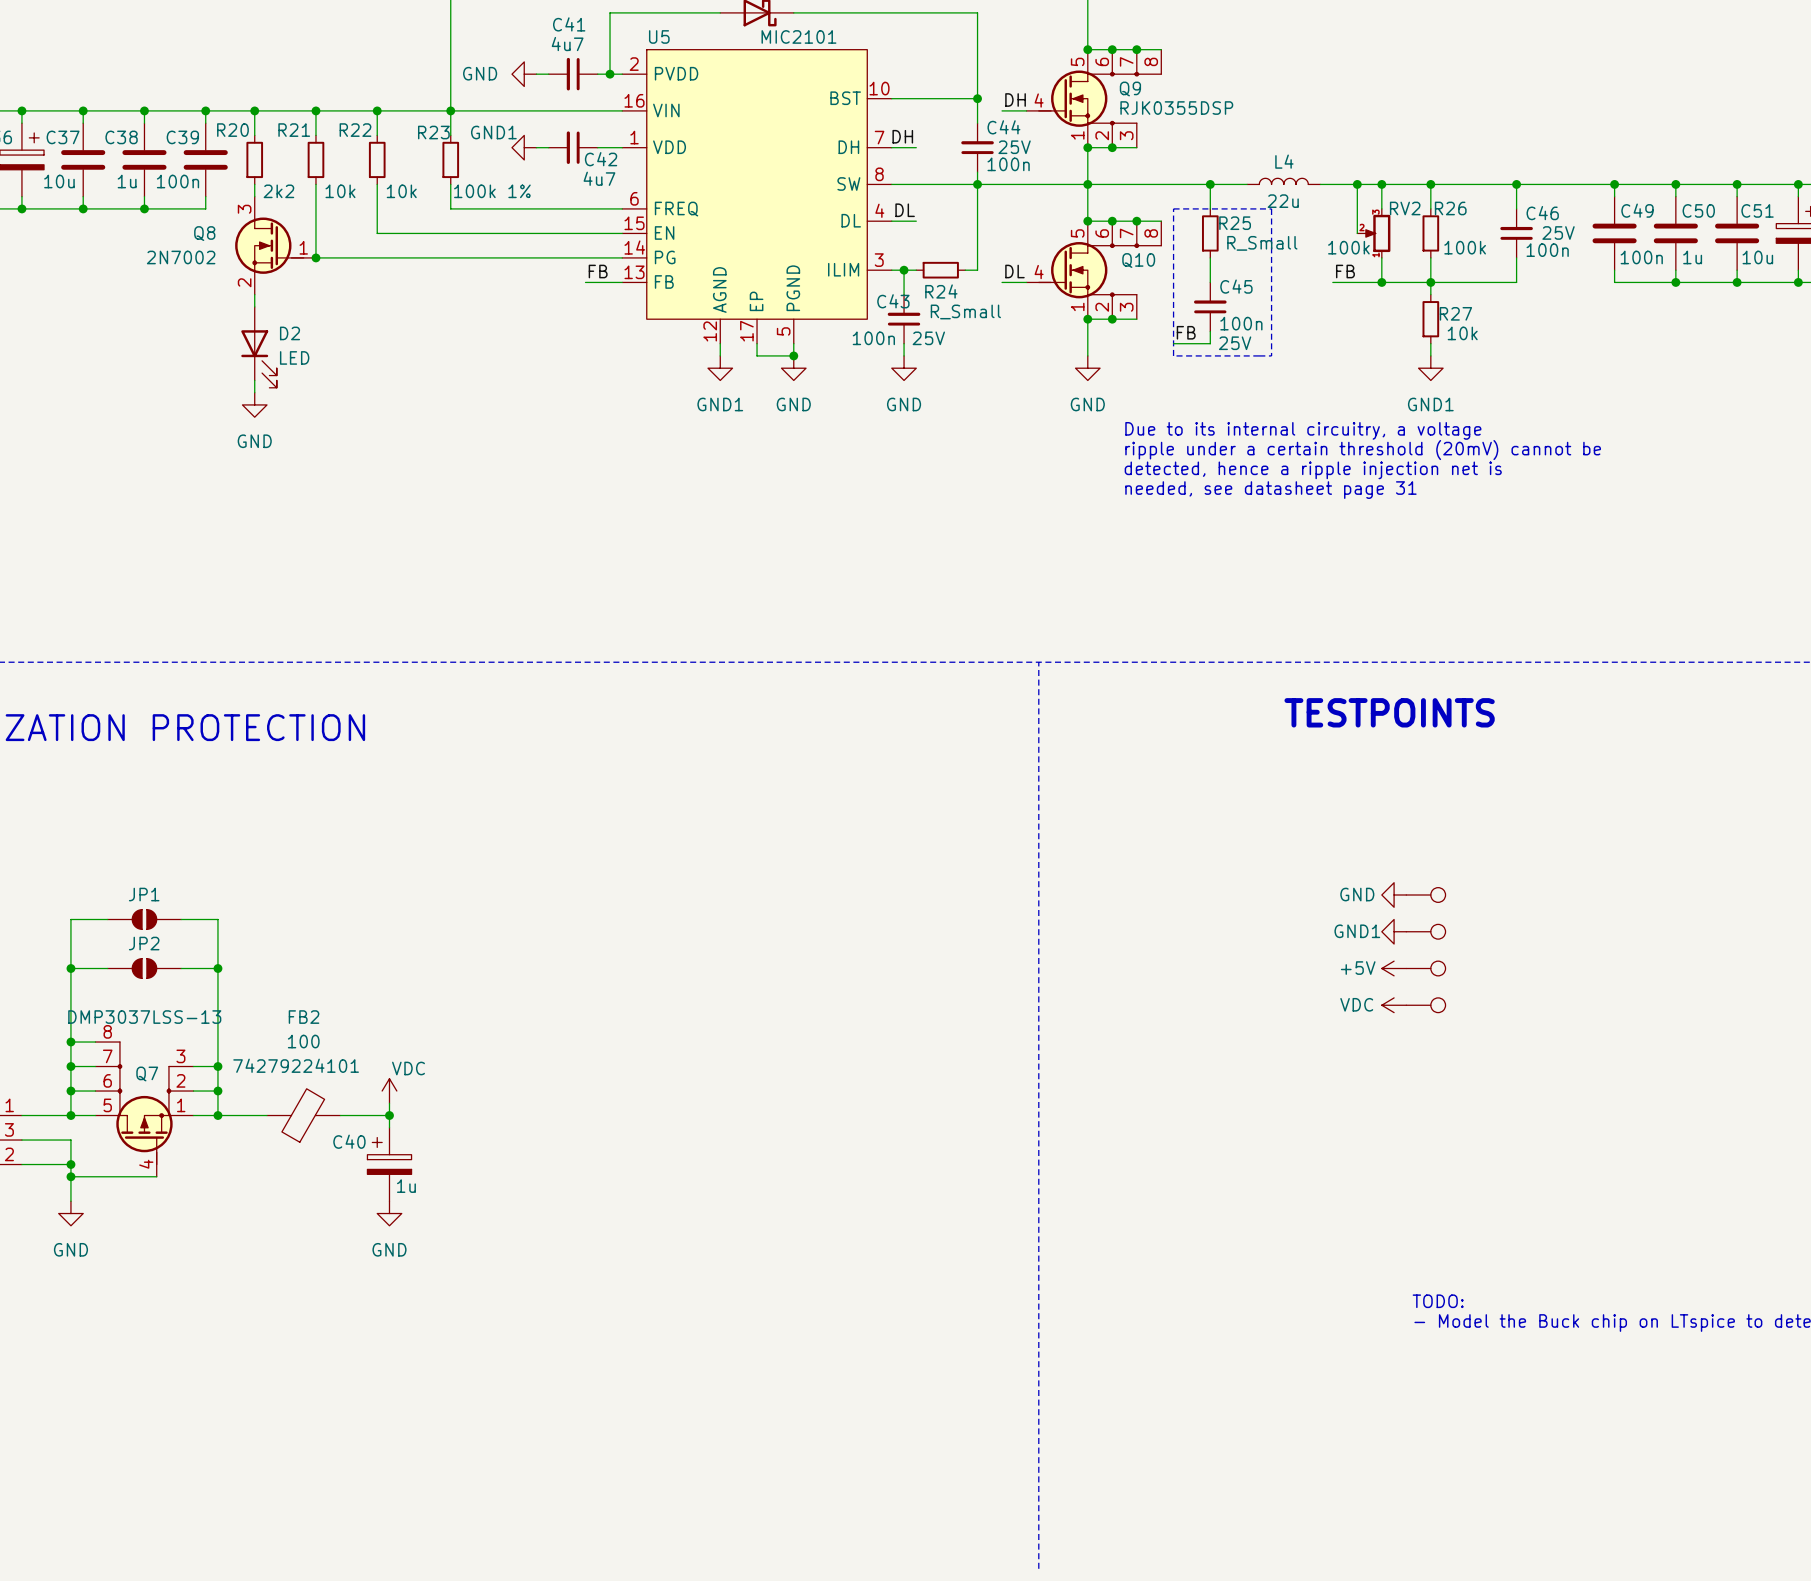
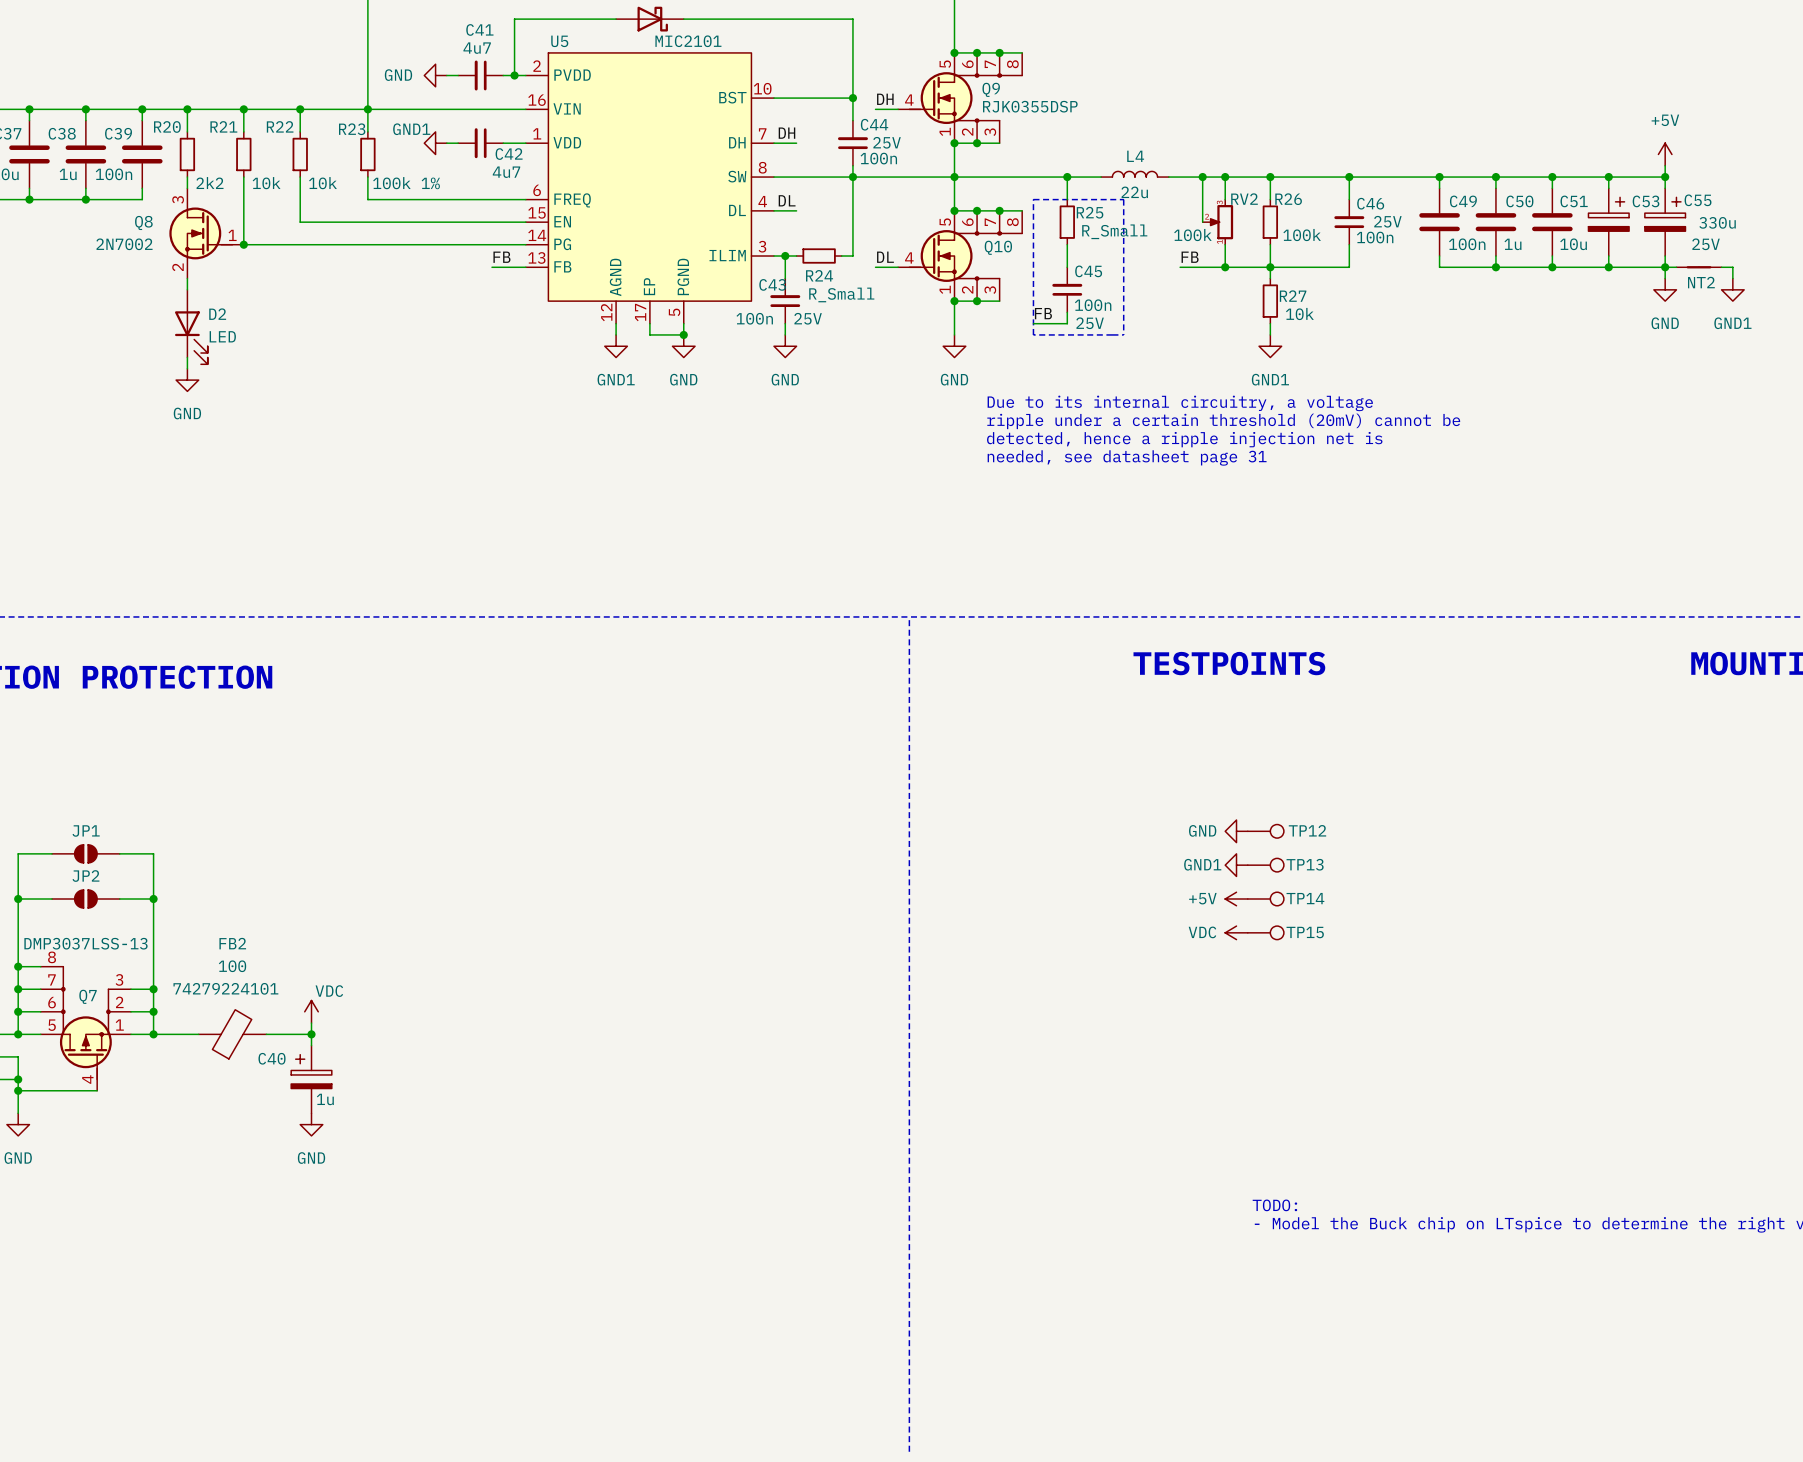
TP12 name: none -> TP12 (1307, 830)
TP13 name: none -> TP13 (1305, 864)
TP14 name: none -> TP14 (1305, 898)
TP15 name: none -> TP15 (1305, 932)

